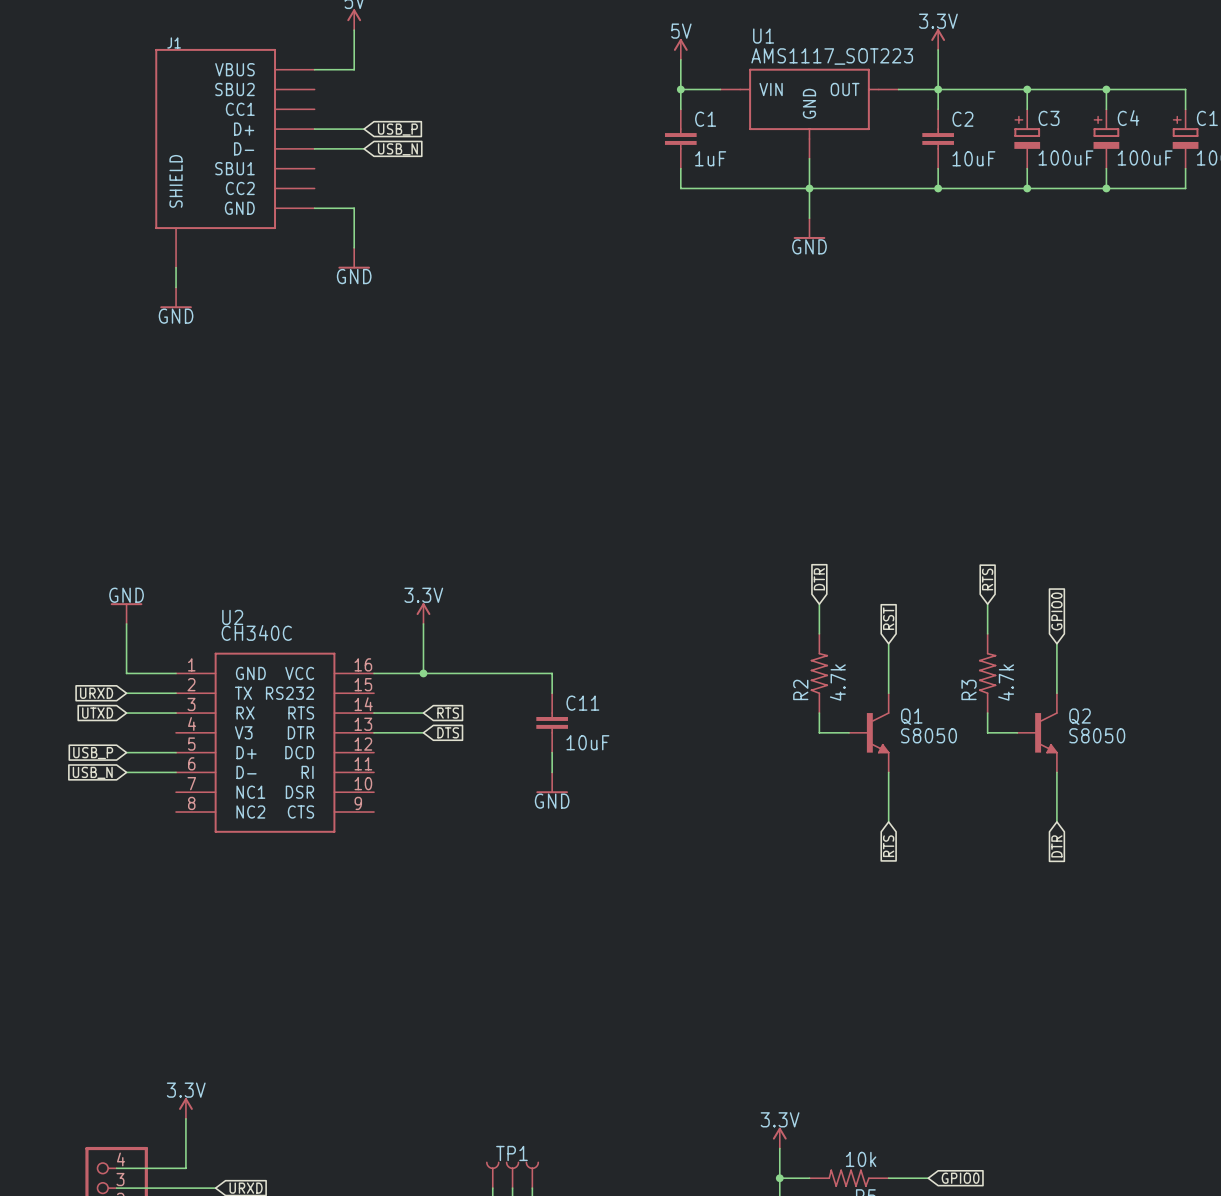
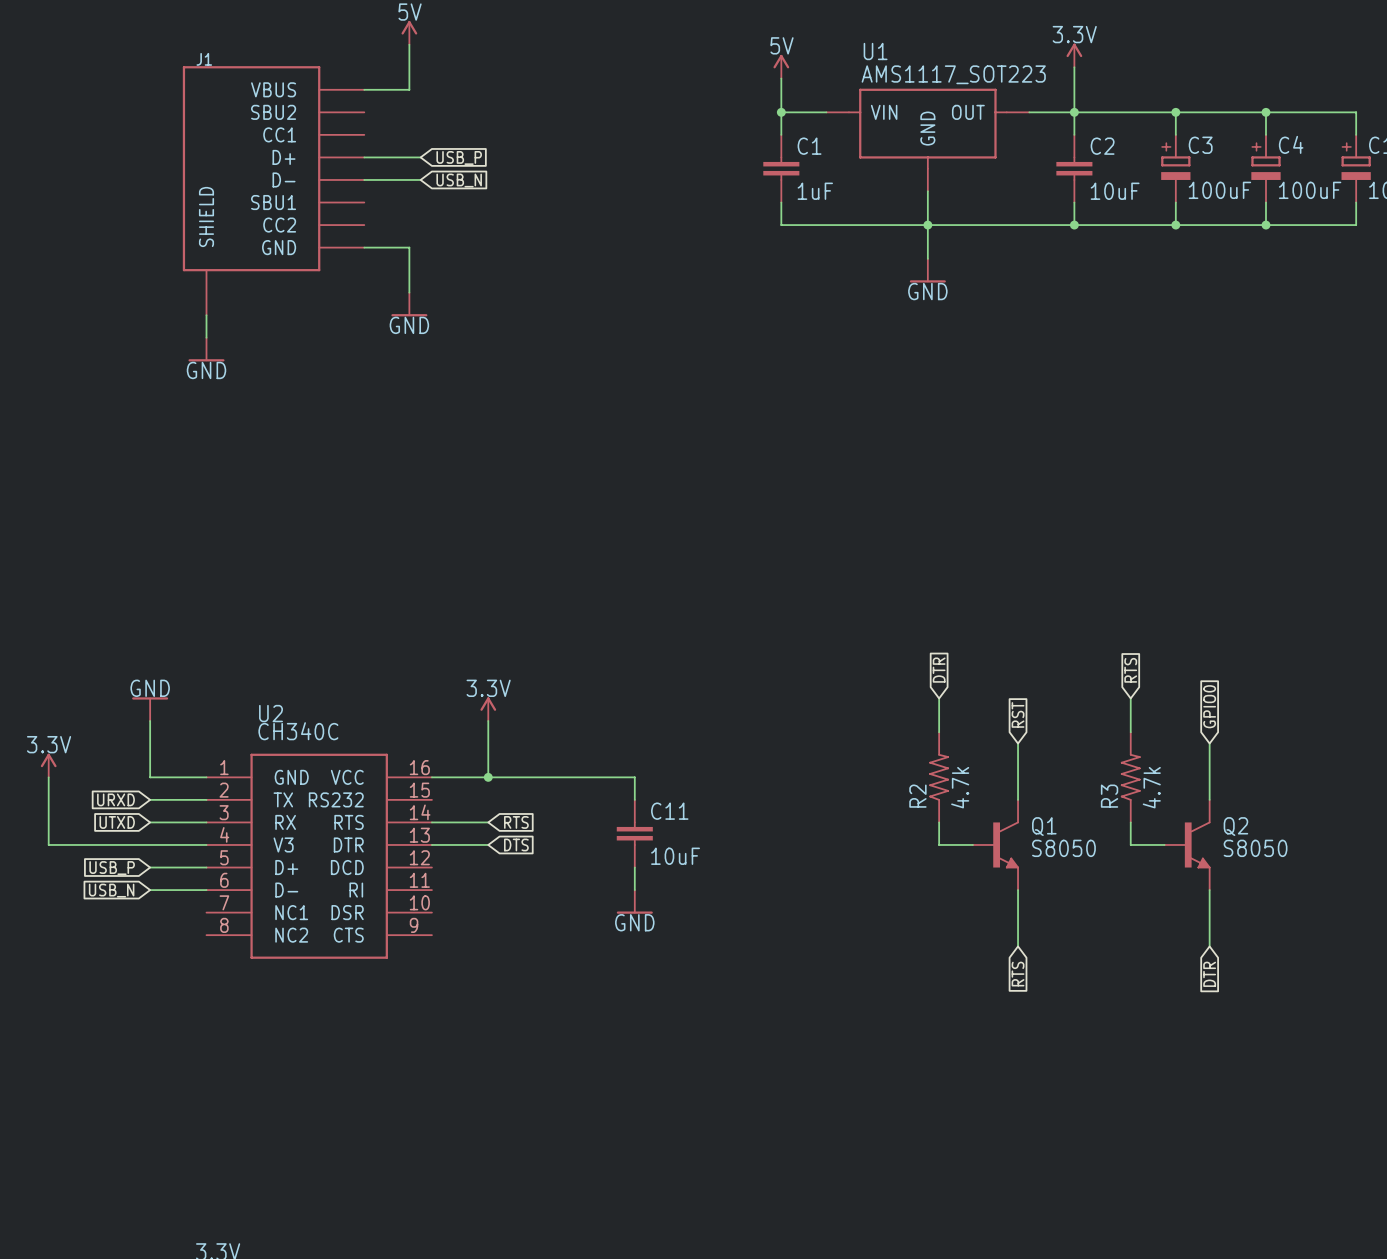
power symbol: none -> 3.3V (48, 765)
wire: none -> (48, 777) (48, 844) (206, 844)

